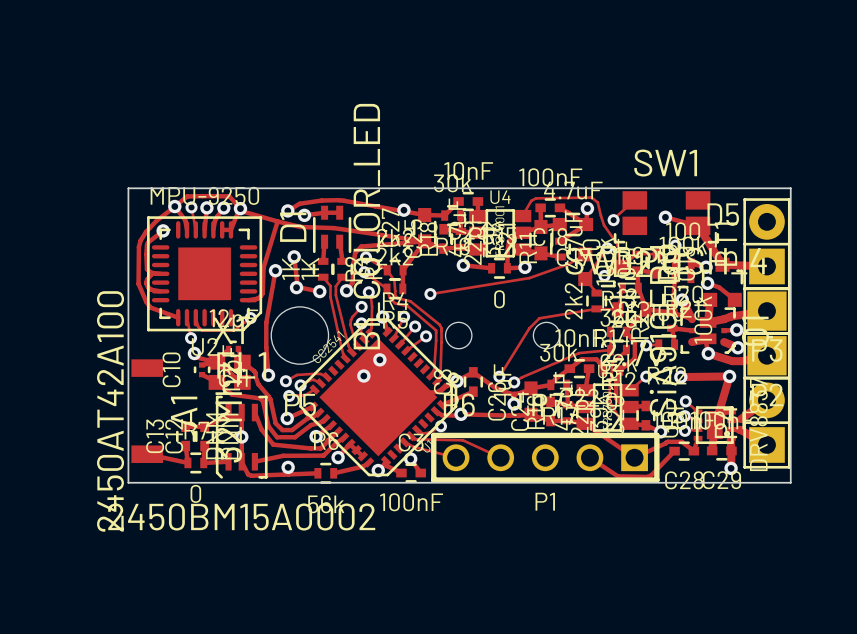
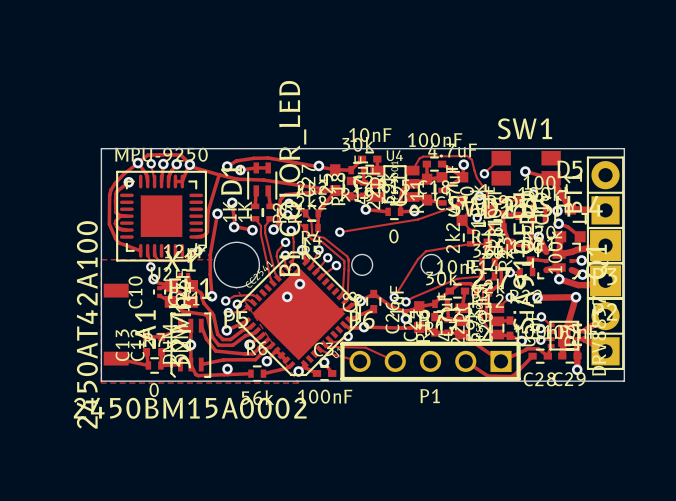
zone outline: none -> (101, 259) (217, 259) (298, 383) (101, 383) (101, 259)

